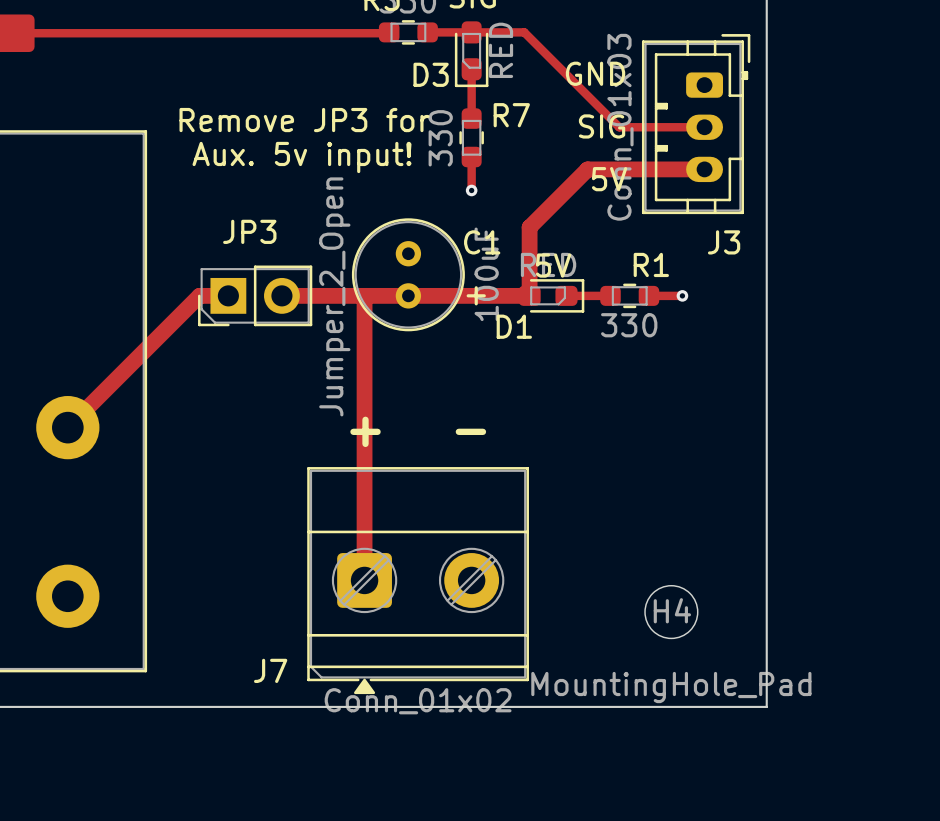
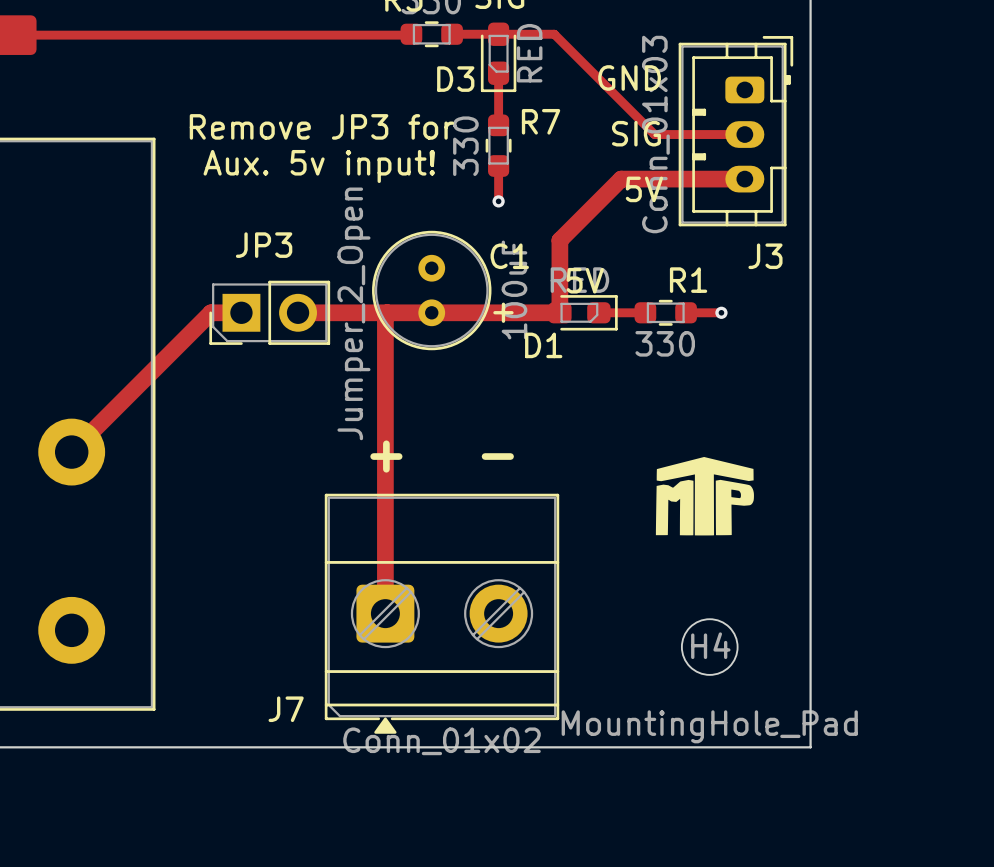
drawing: none -> [655, 456, 754, 536]

